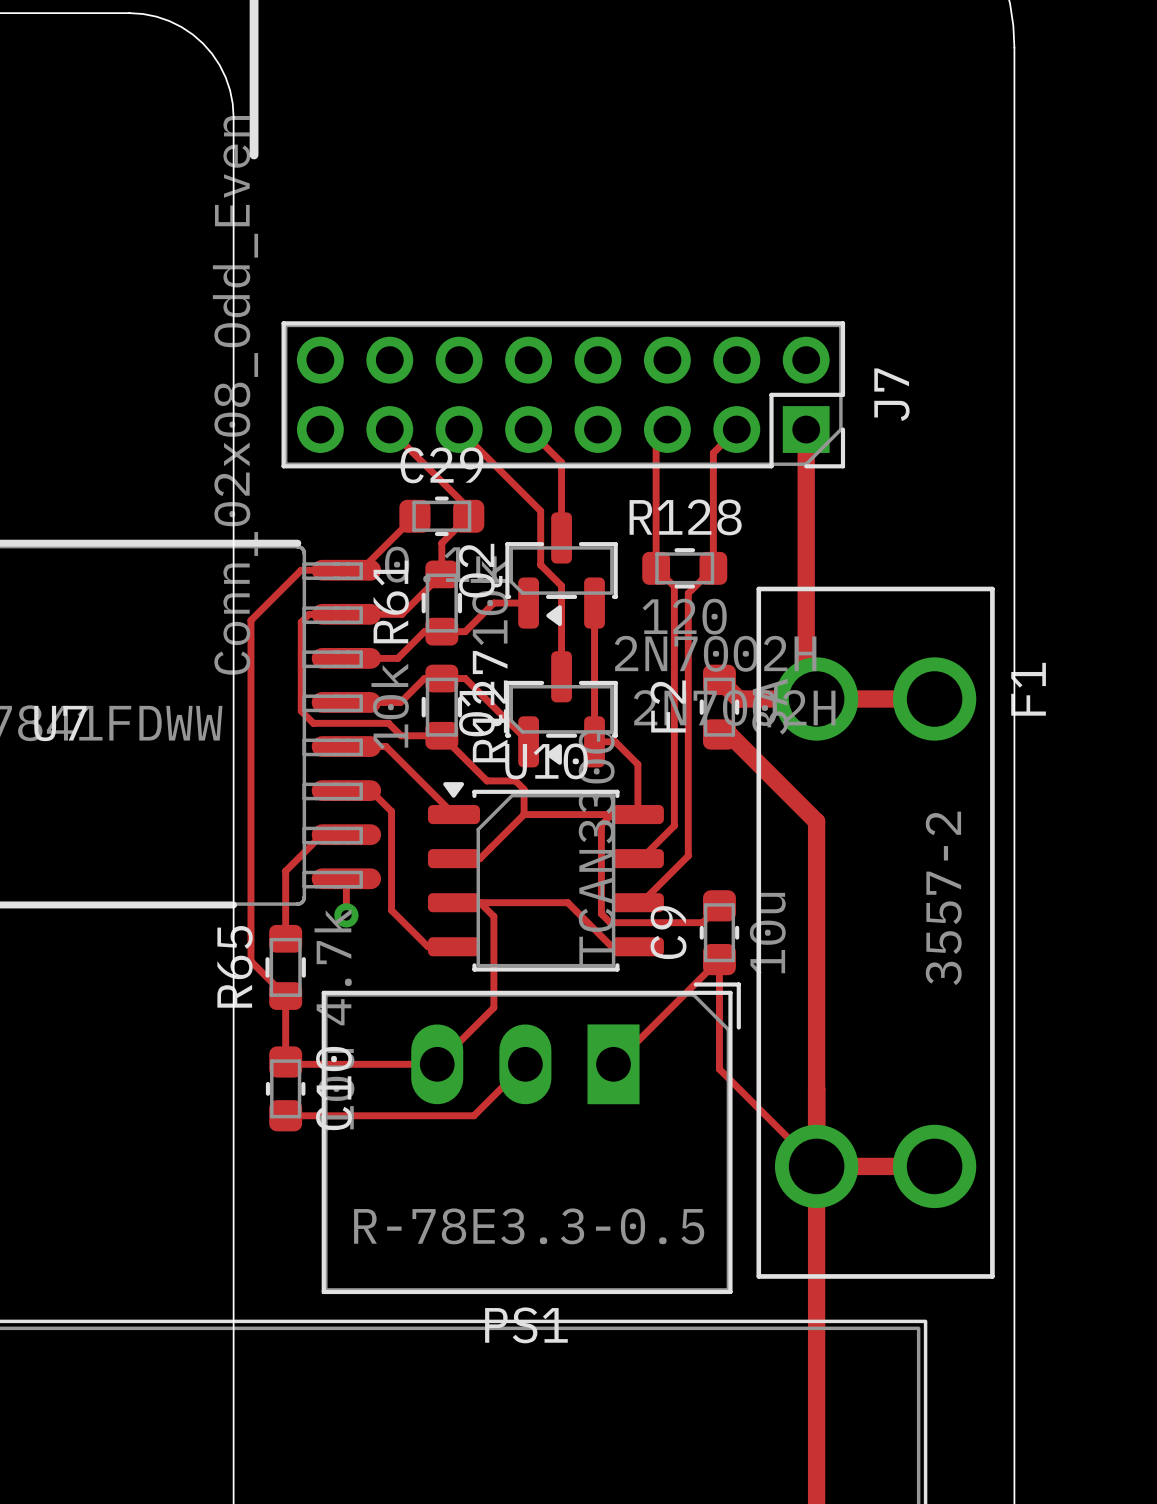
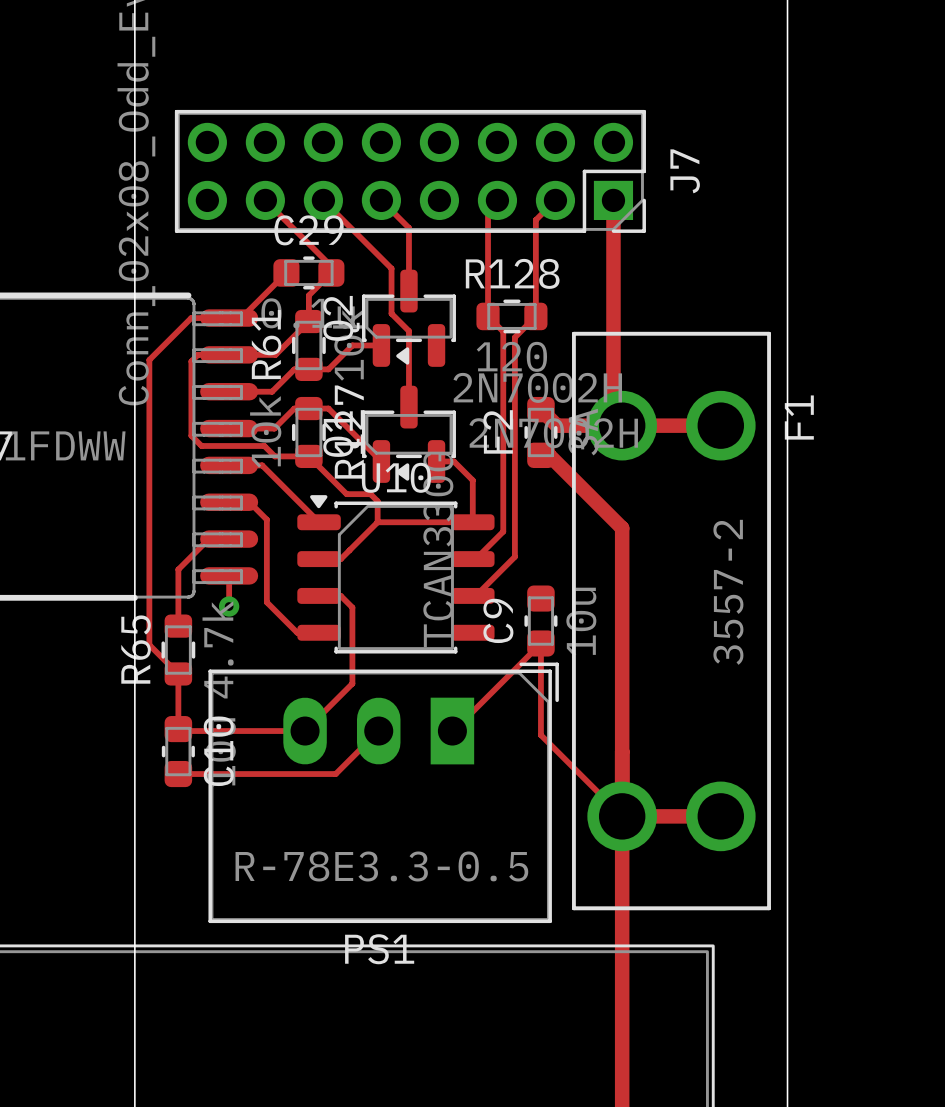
track: (594, 603) (594, 741) -> none
track: (611, 814) (601, 825) (601, 913) (610, 922) (702, 922) (719, 905) -> none
track: (480, 902) (567, 902) (611, 946) (637, 946) -> none

